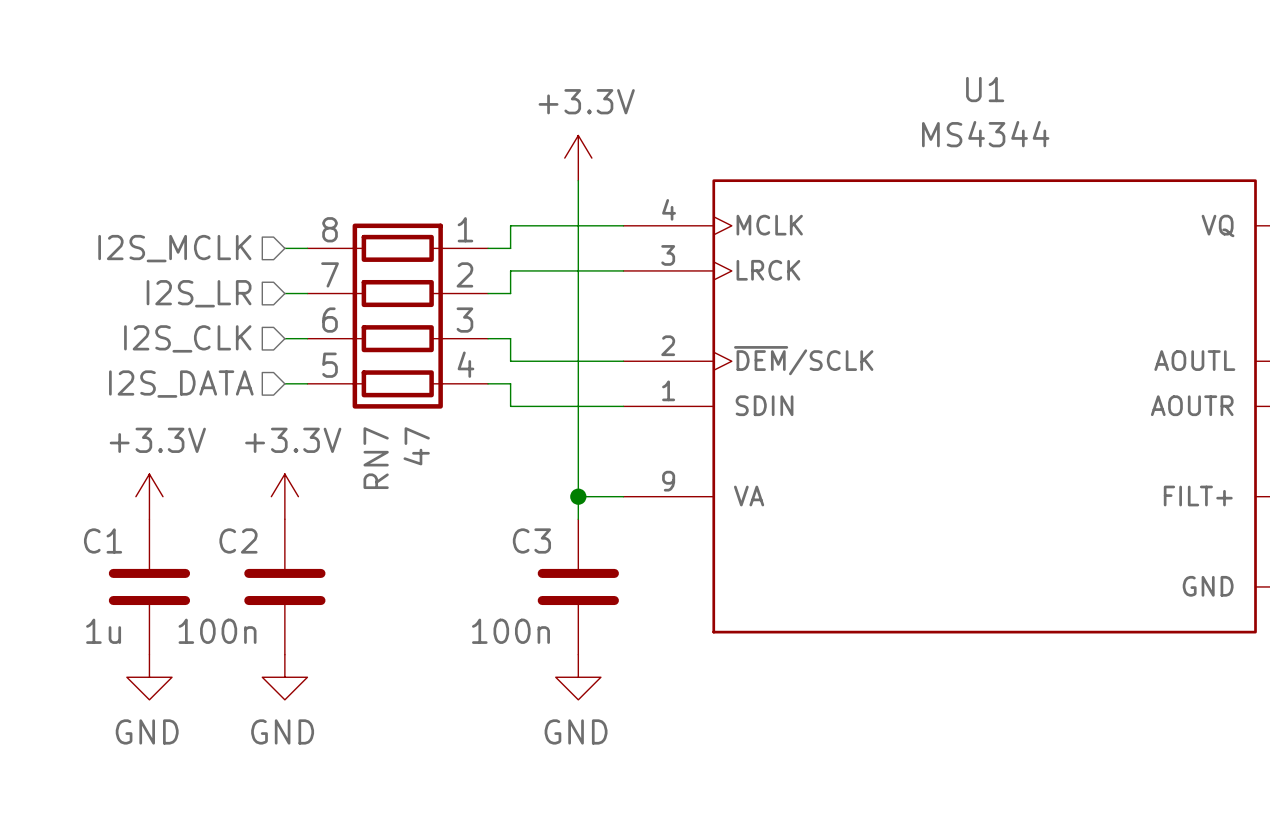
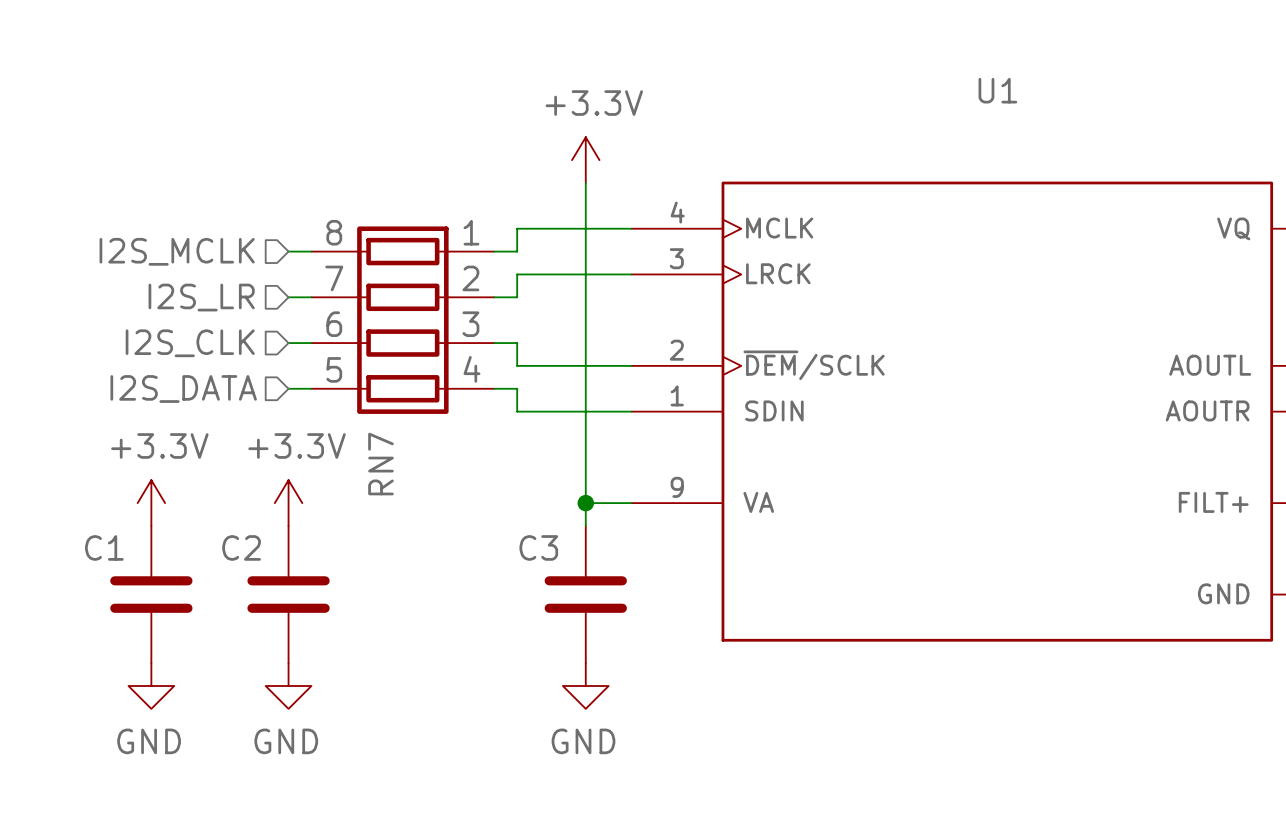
U1 value: MS4344 (985, 134) -> none
RN7 value: 47 (416, 446) -> none
C1 value: 1u (103, 631) -> none
C2 value: 100n (217, 631) -> none
C3 value: 100n (510, 631) -> none

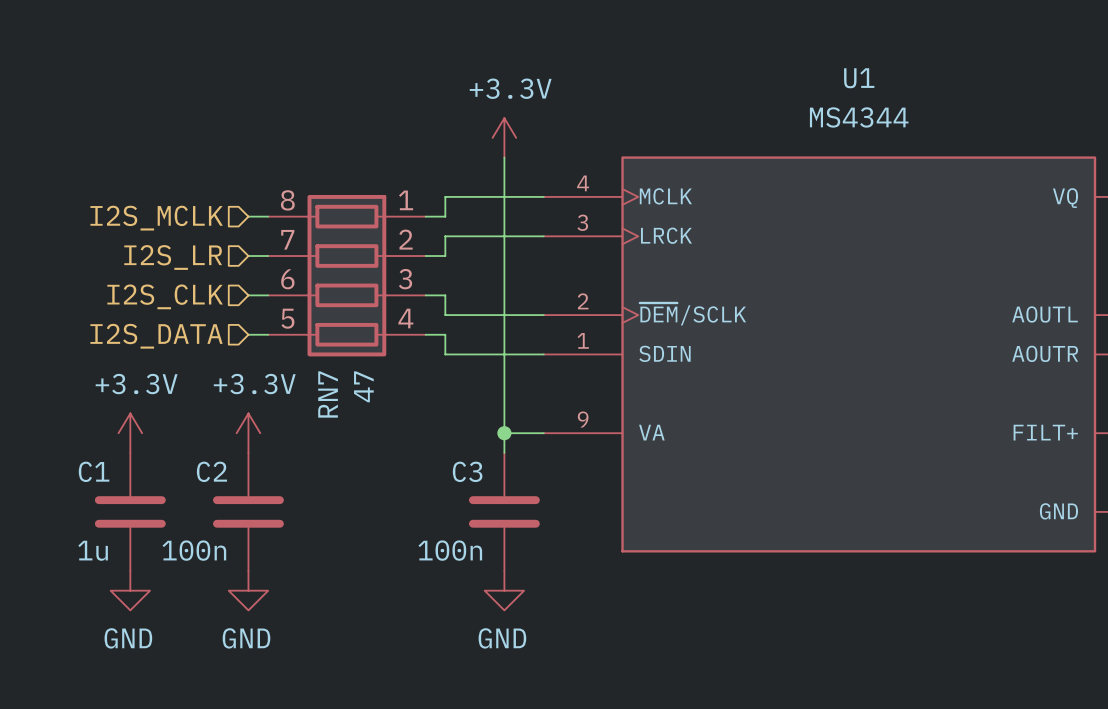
U1 value: none -> MS4344 (859, 117)
RN7 value: none -> 47 (363, 386)
C1 value: none -> 1u (93, 550)
C2 value: none -> 100n (194, 550)
C3 value: none -> 100n (450, 550)

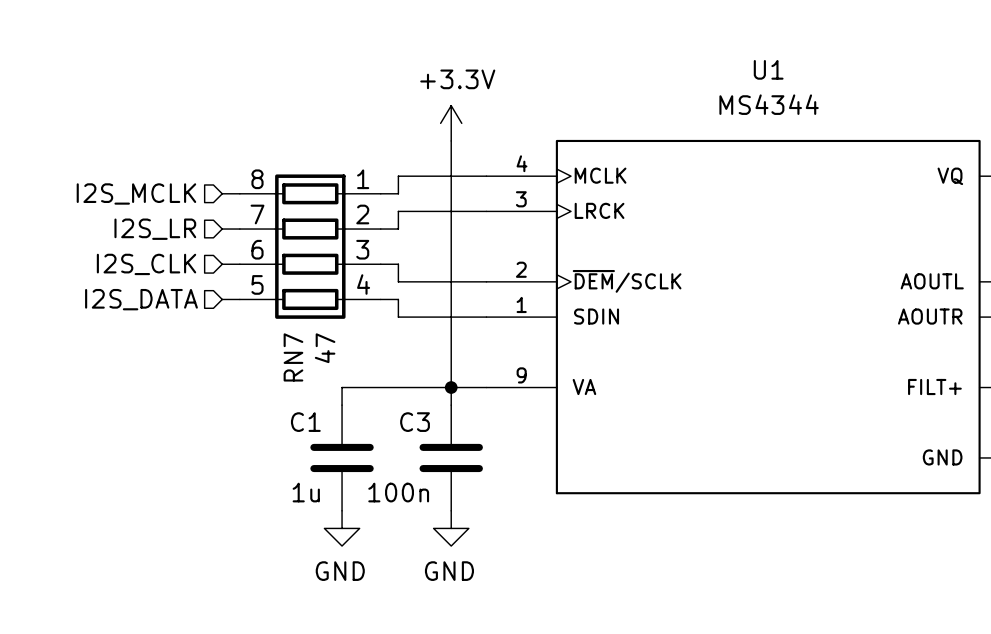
power symbol: +3.3V (130, 433) -> none
power symbol: +3.3V (248, 433) -> none
wire: none -> (451, 387) (342, 387) (342, 405)
C1 position: (130, 511) -> (342, 457)
C2: 100n (248, 511) -> none
power symbol: GND (130, 590) -> none
power symbol: GND (248, 590) -> none
power symbol: none -> GND (342, 528)

